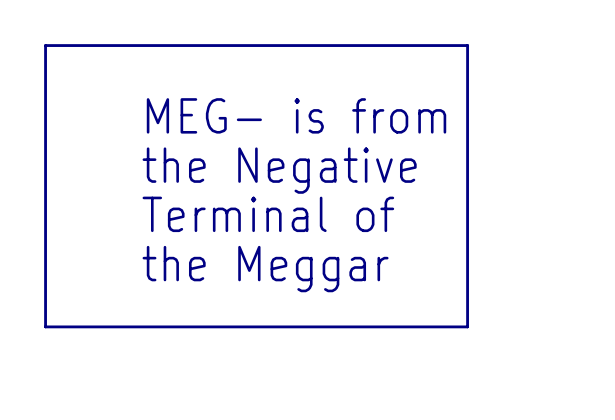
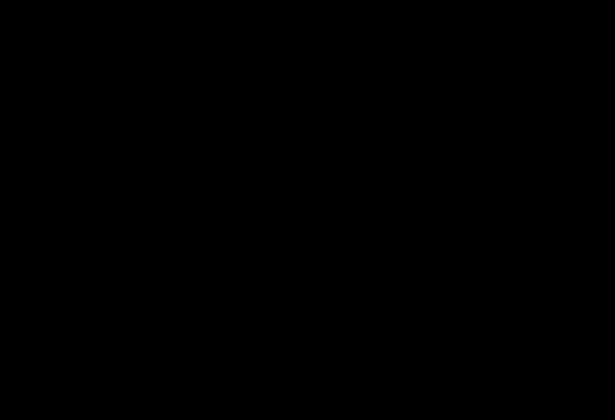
line: (45, 45) (45, 326) (467, 326) (467, 45) (45, 45) -> none
text: MEG- is from (296, 115) -> none
text: the Negative (279, 170) -> none
text: Terminal of (268, 214) -> none
text: the Meggar (265, 269) -> none

